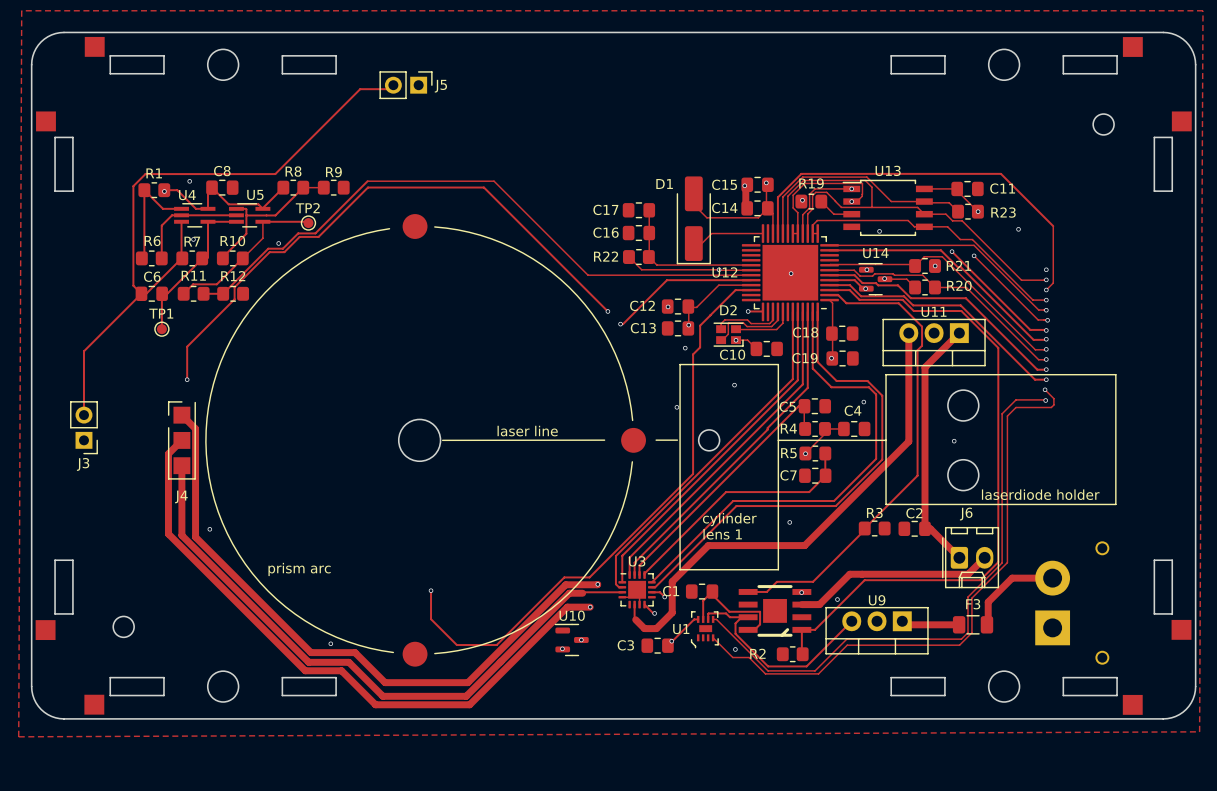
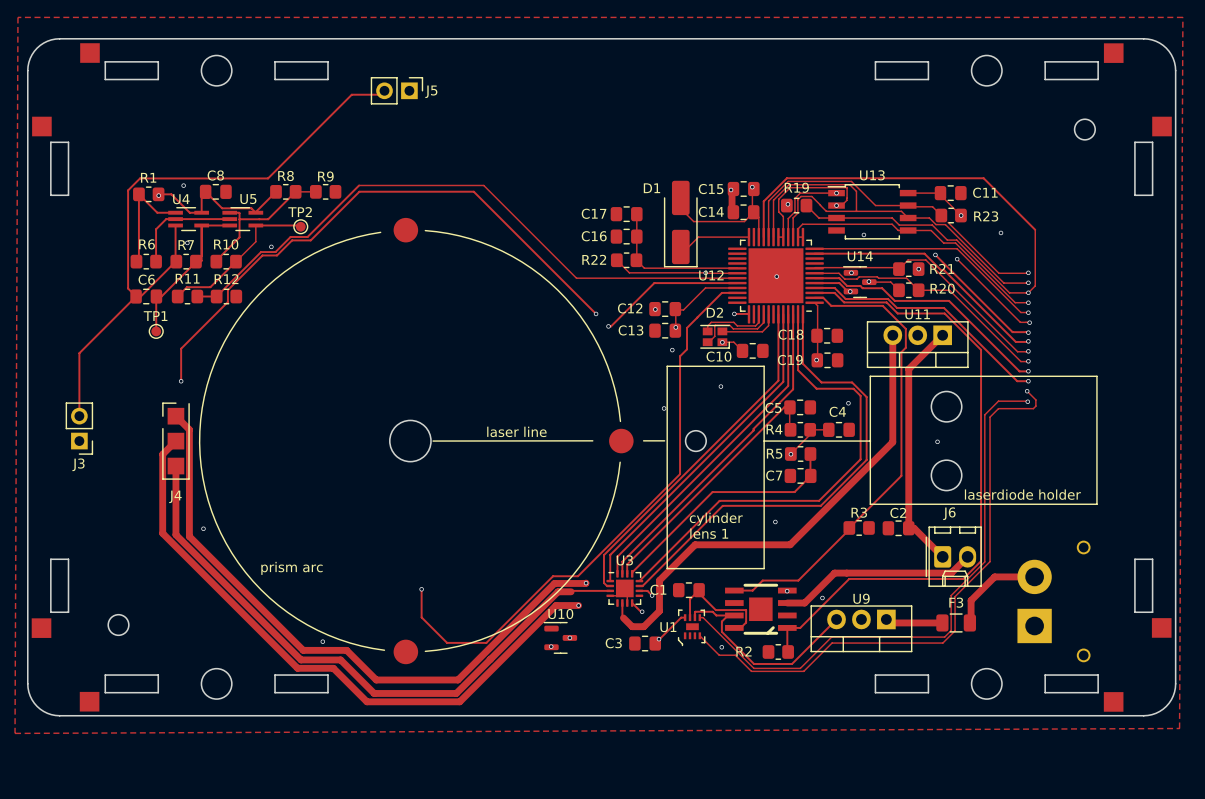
track: none -> (836, 218) (892, 218) (899, 225) (932, 225) (947, 240) (956, 240) (1009, 292) (1028, 292)
track: none -> (948, 222) (998, 273) (1027, 273)

